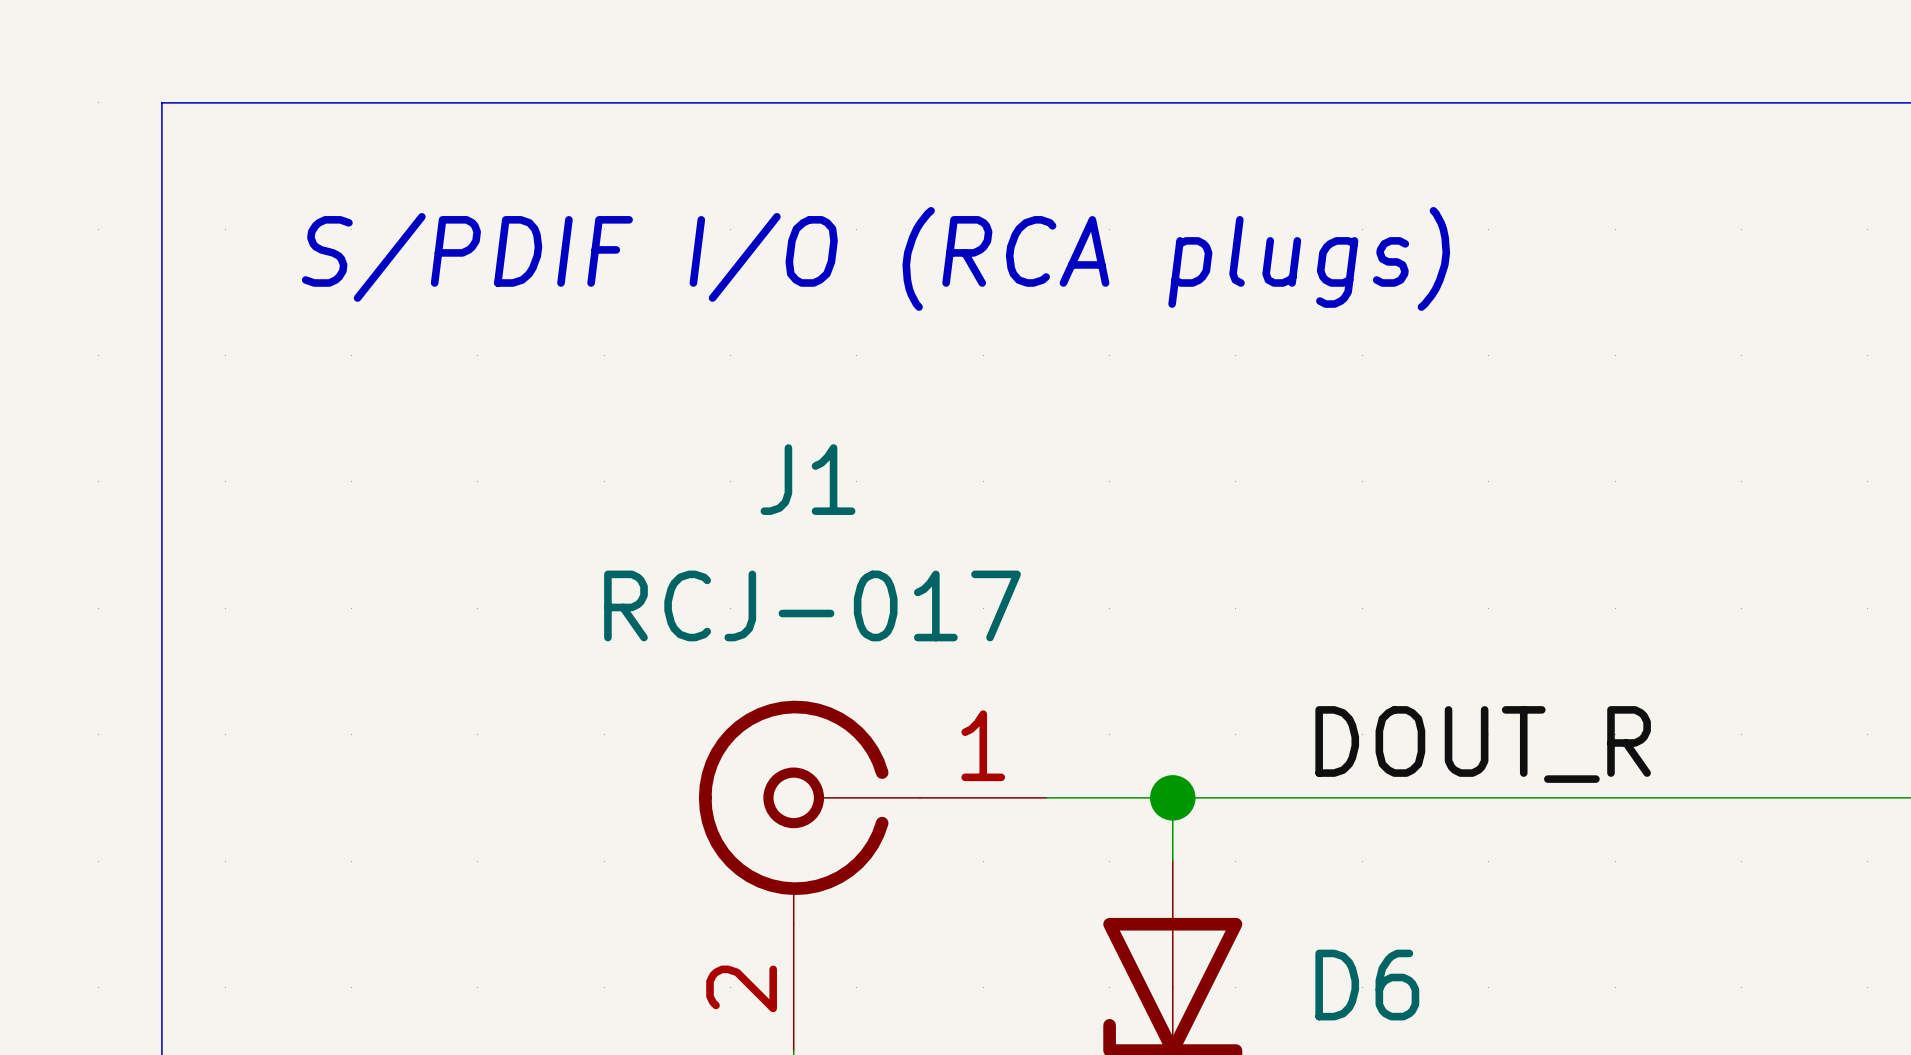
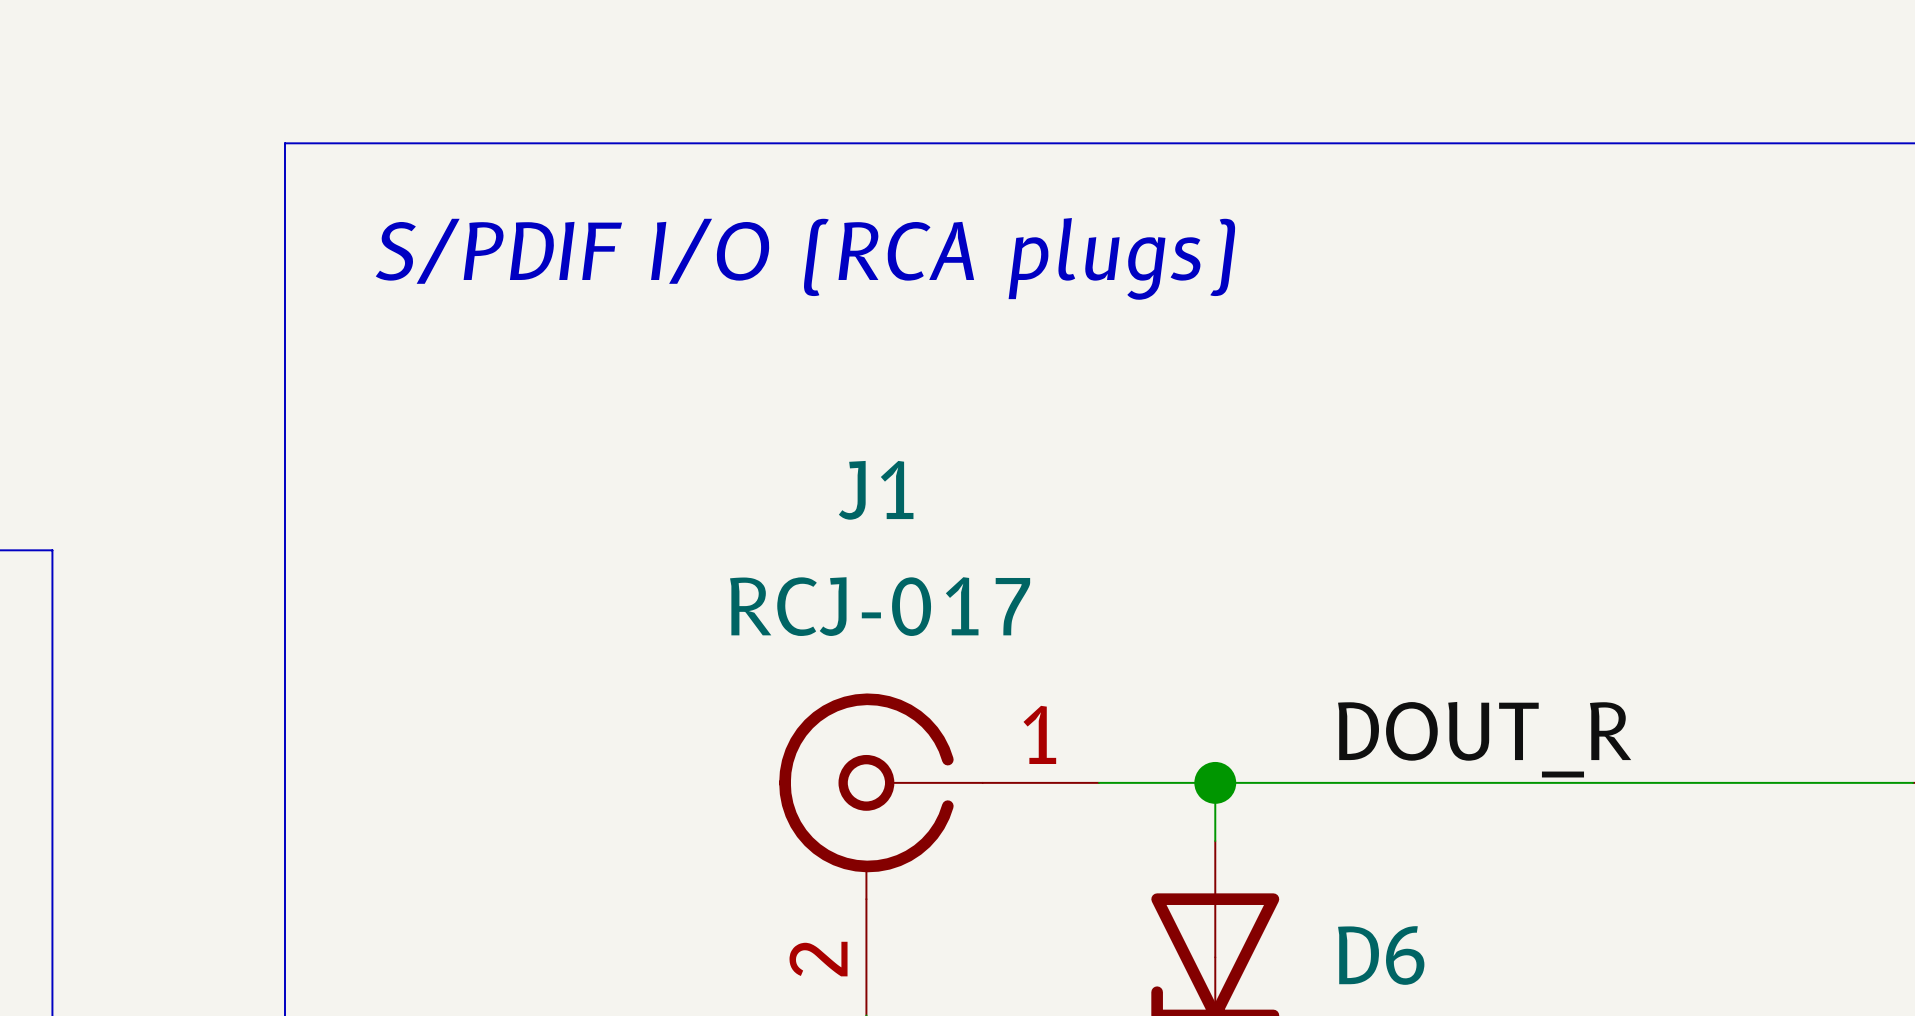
text position: S/PDIF I/O (RCA plugs) (875, 258) -> S/PDIF I/O (RCA plugs) (805, 258)

